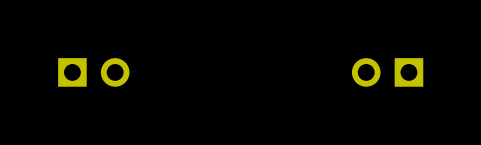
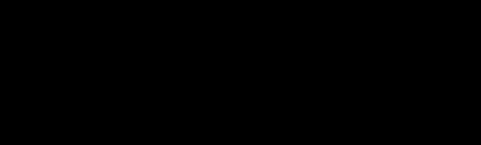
part: (93, 72) -> none
part: (387, 72) -> none

